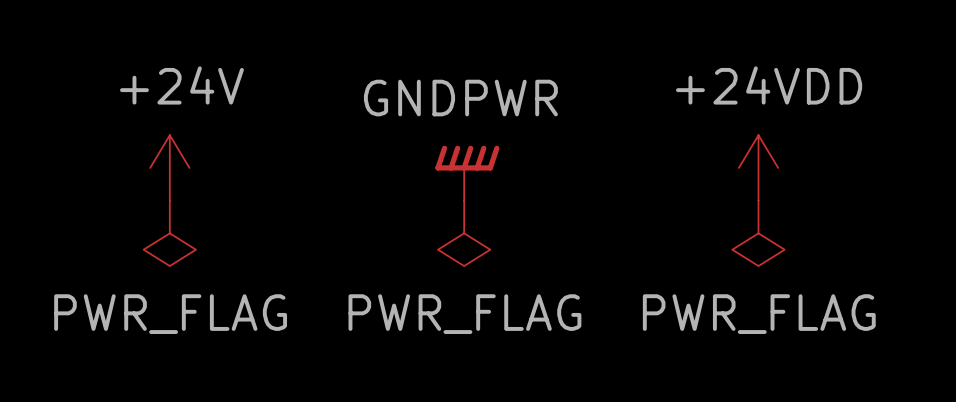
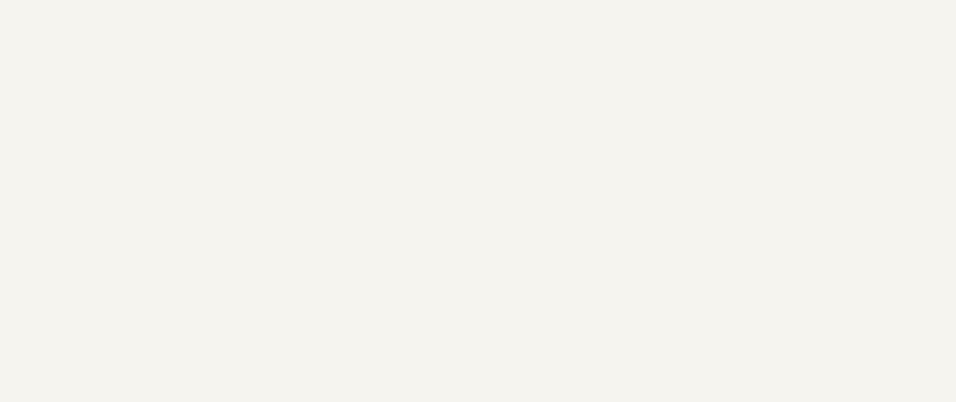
power symbol: +24V (169, 167) -> none
power symbol: +24VDD (758, 167) -> none
power symbol: GNDPWR (467, 173) -> none
power symbol: PWR_FLAG (169, 233) -> none
power symbol: PWR_FLAG (464, 233) -> none
power symbol: PWR_FLAG (758, 233) -> none

